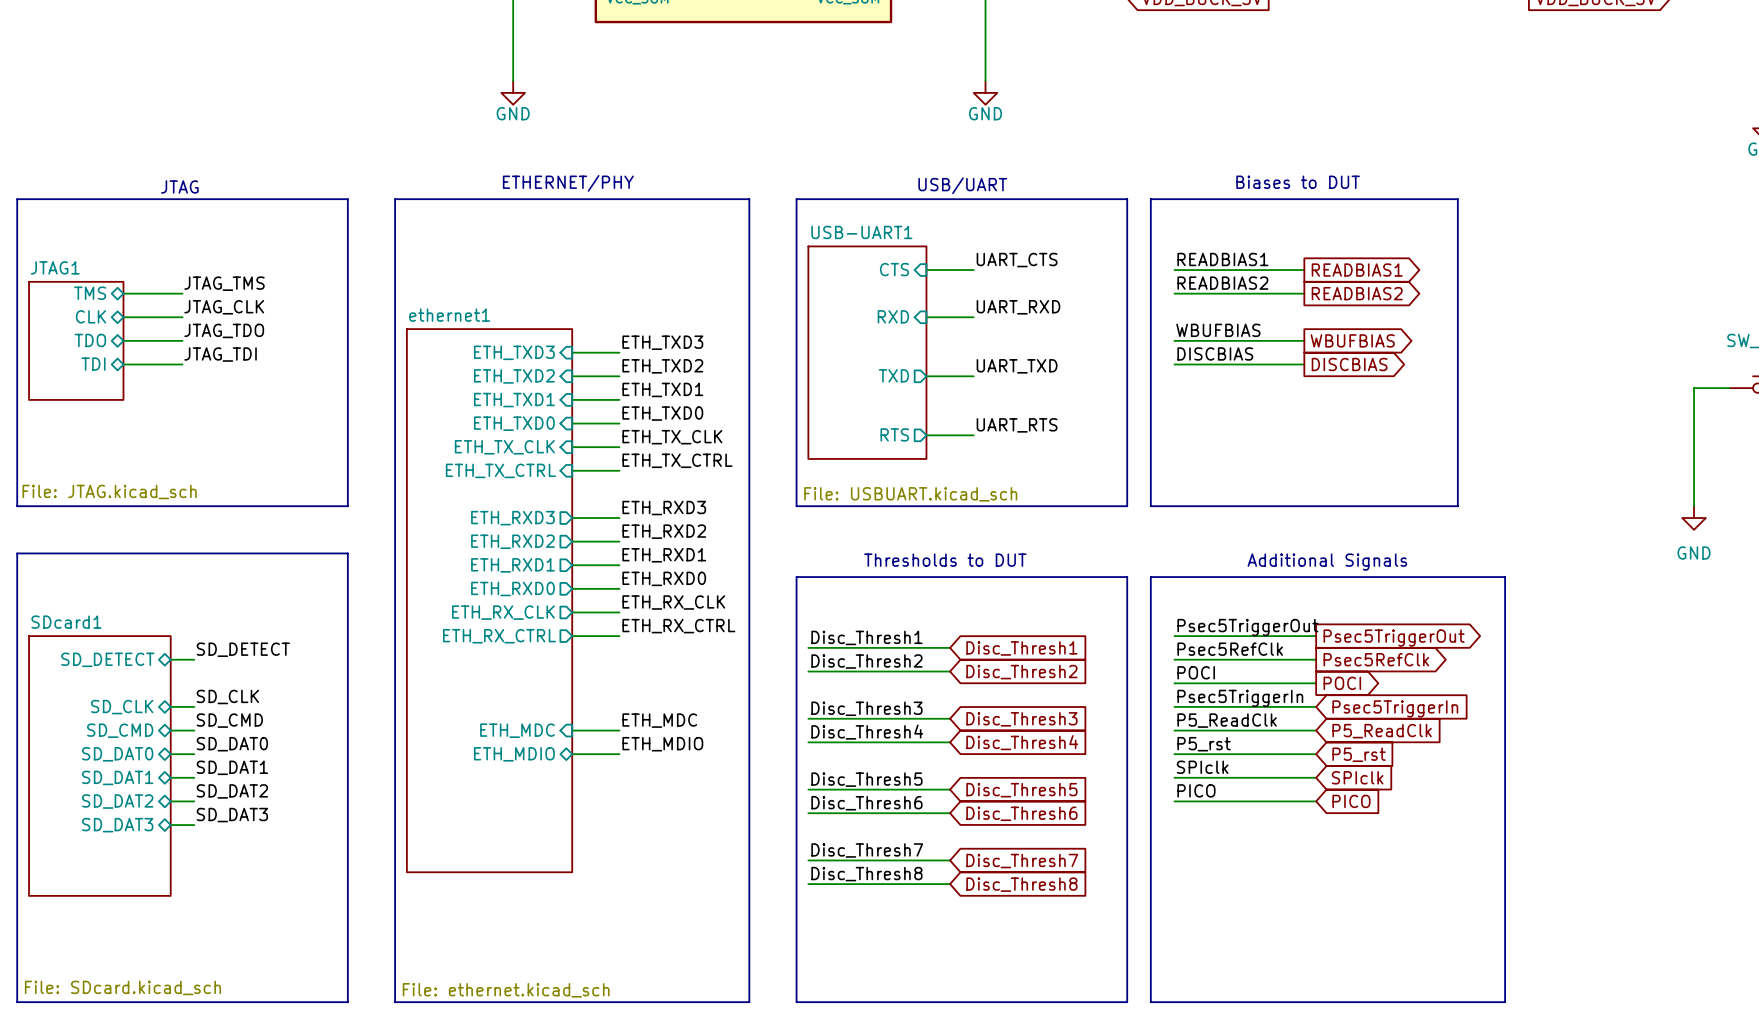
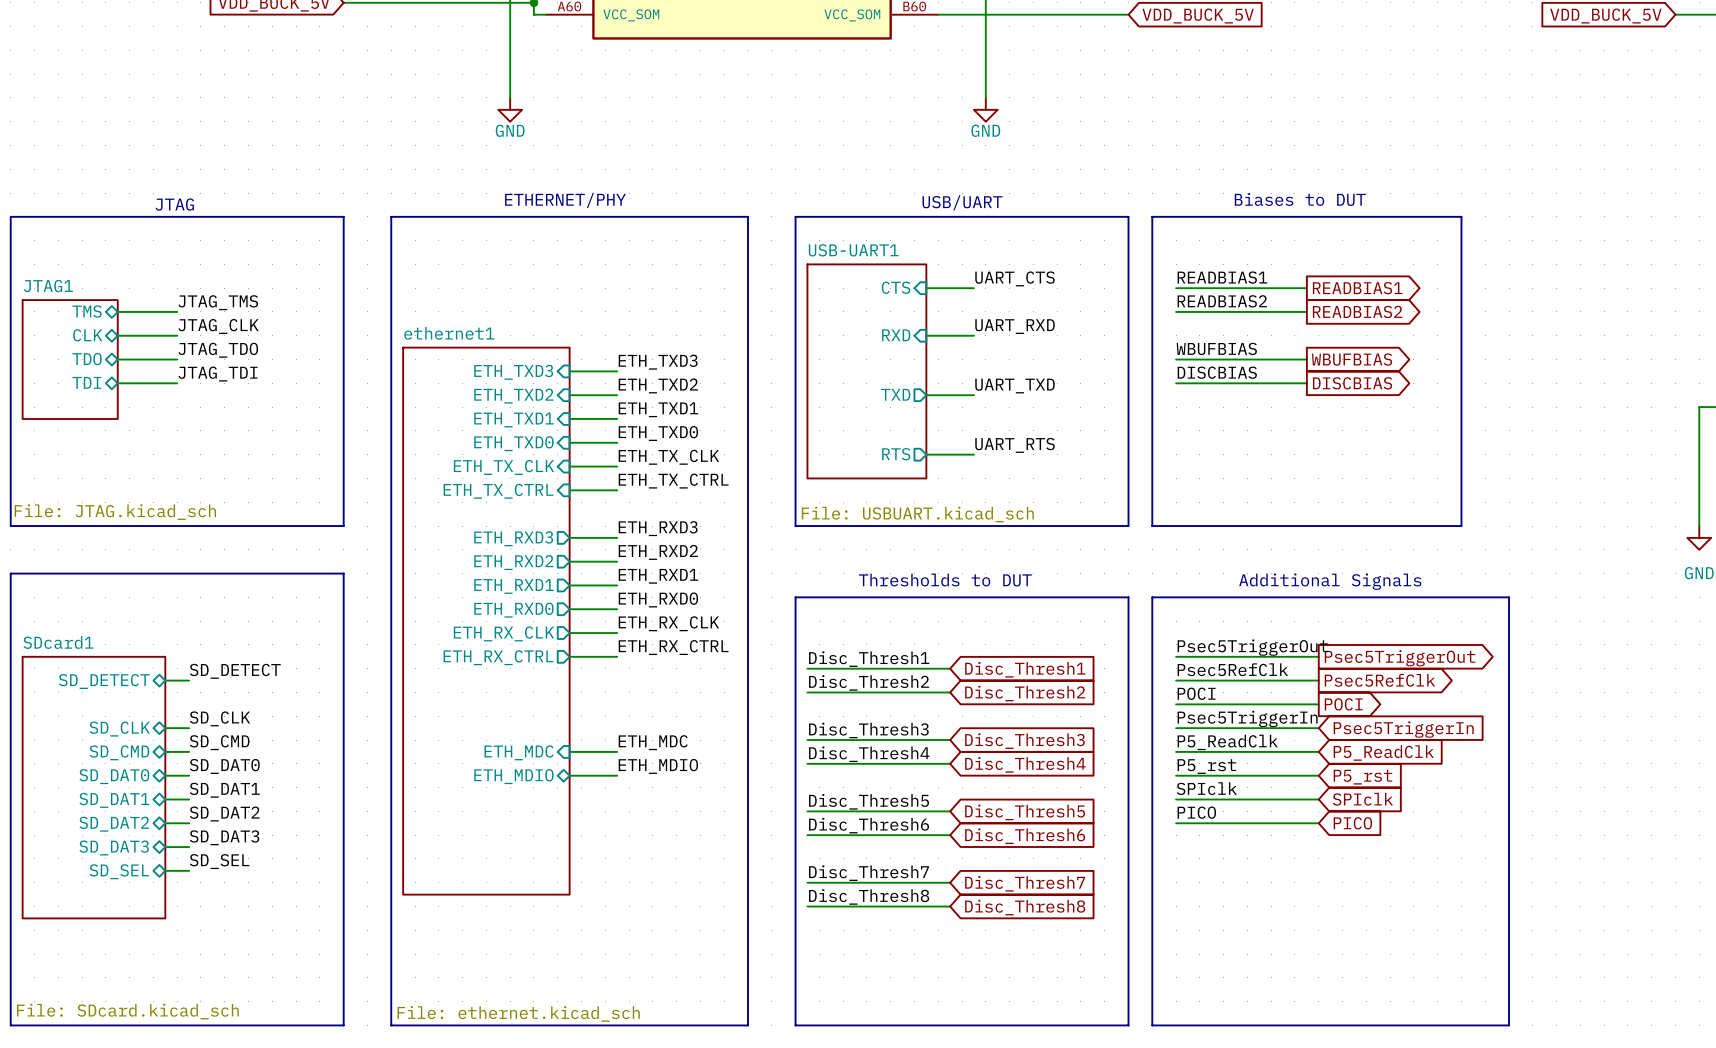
label: none -> SD_SEL (219, 861)
sheet pin: none -> SD_SEL (119, 871)
wire: none -> (165, 870) (189, 870)

